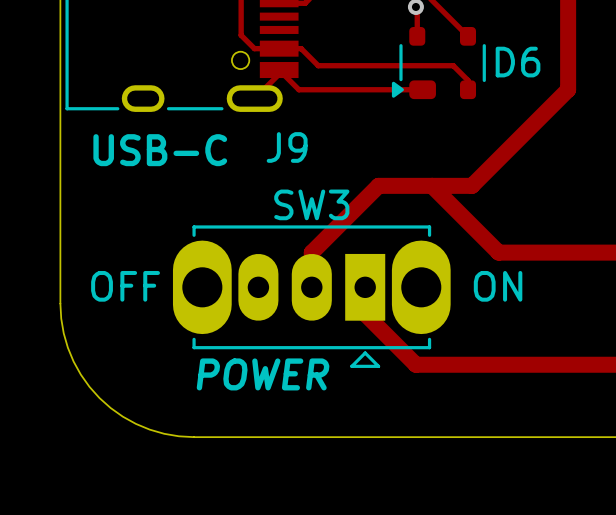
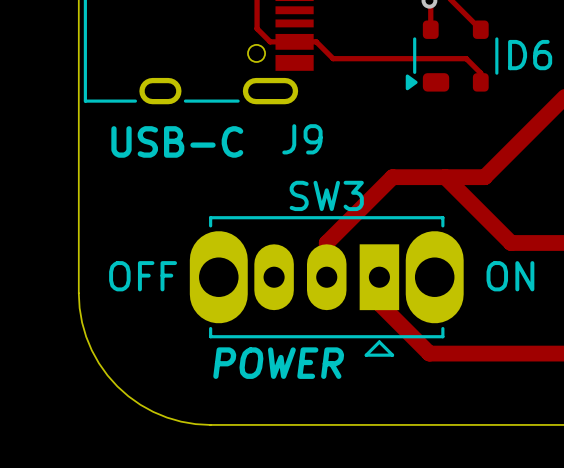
top track: (422, 89) (298, 89) (279, 70) (279, 74) (254, 98) -> none

